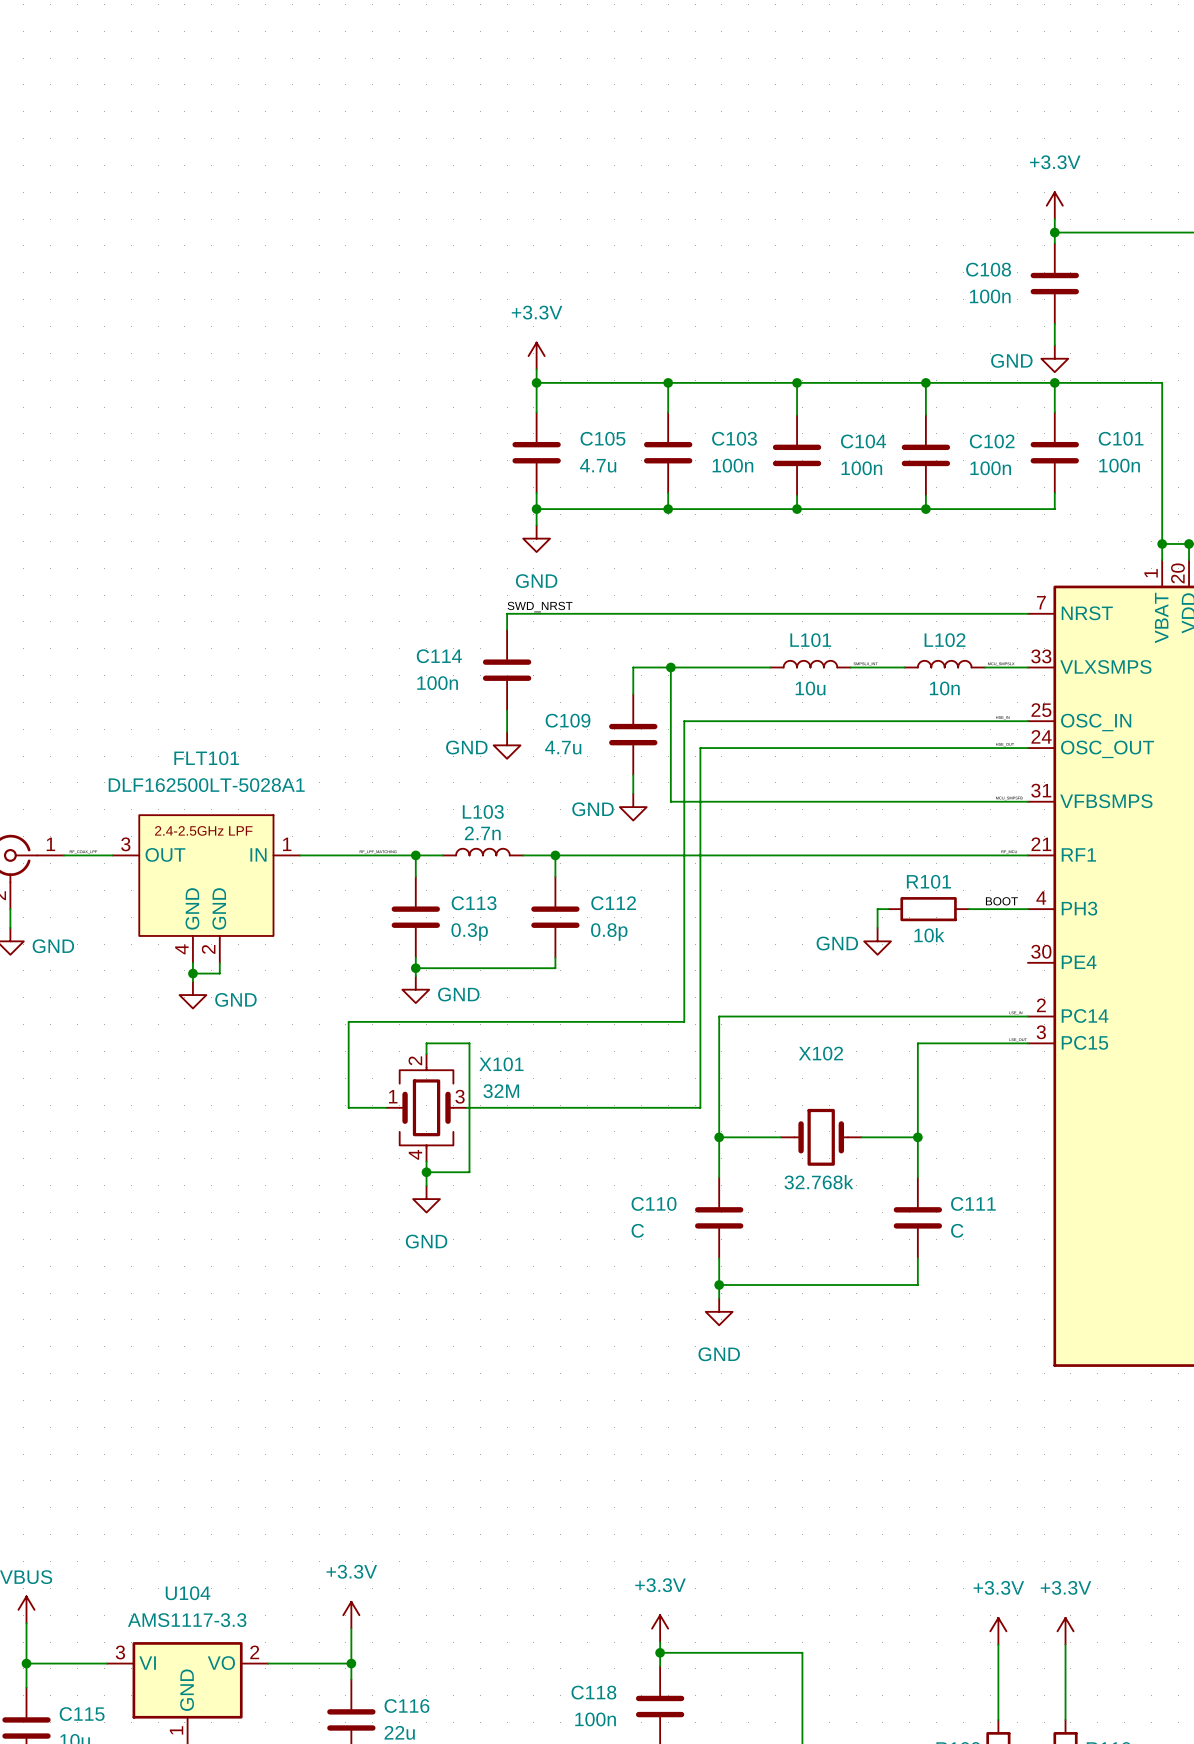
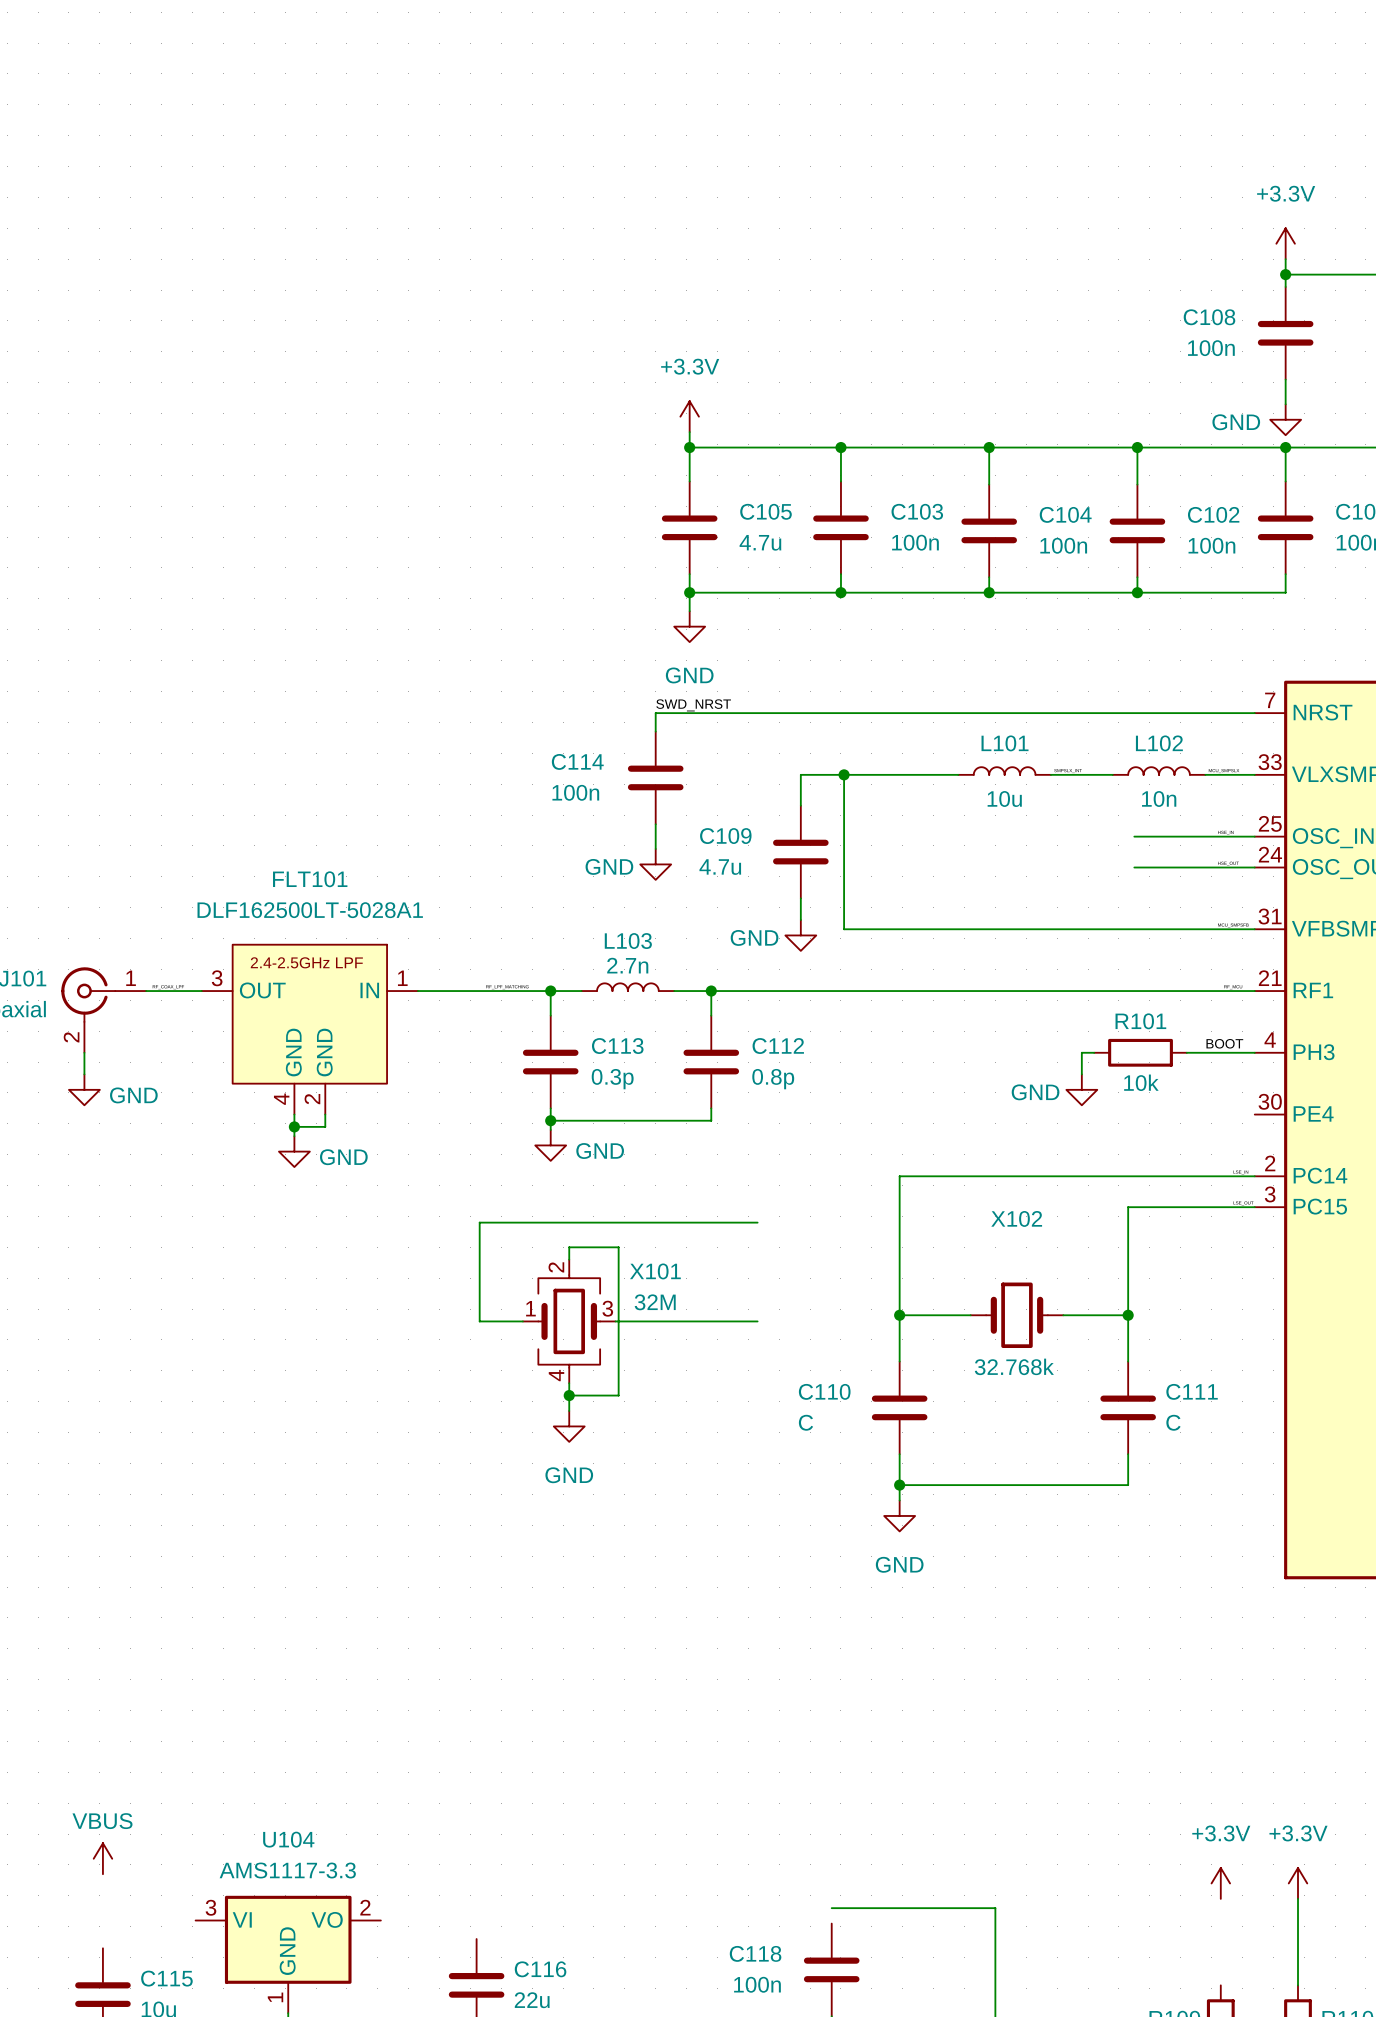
wire: (923, 721) (684, 721) (684, 1021) (348, 1021) (348, 1107) (386, 1107) -> none
wire: (923, 748) (700, 748) (700, 1107) (466, 1107) -> none
wire: (426, 1054) (426, 1043) (469, 1043) (469, 1172) (426, 1172) -> (569, 1259) (569, 1247) (618, 1247) (618, 1395) (569, 1395)
wire: none -> (757, 1222) (479, 1222) (479, 1321) (522, 1321)
X101 position: (426, 1107) -> (569, 1321)
wire: none -> (615, 1321) (757, 1321)
wire: (426, 1161) (426, 1185) -> (569, 1383) (569, 1410)
junction position: (426, 1172) -> (569, 1395)
power symbol position: GND (426, 1199) -> GND (569, 1426)
power symbol: +3.3V (351, 1615) -> none
wire: (26, 1623) (26, 1687) -> none
wire: (351, 1628) (351, 1679) -> none
power symbol: +3.3V (660, 1628) -> none
wire: (660, 1642) (660, 1666) -> none
wire: (998, 1644) (998, 1719) -> none
junction: (660, 1652) -> none
wire: (26, 1663) (107, 1663) -> none
junction: (26, 1663) -> none
wire: (268, 1663) (351, 1663) -> none
junction: (351, 1663) -> none

